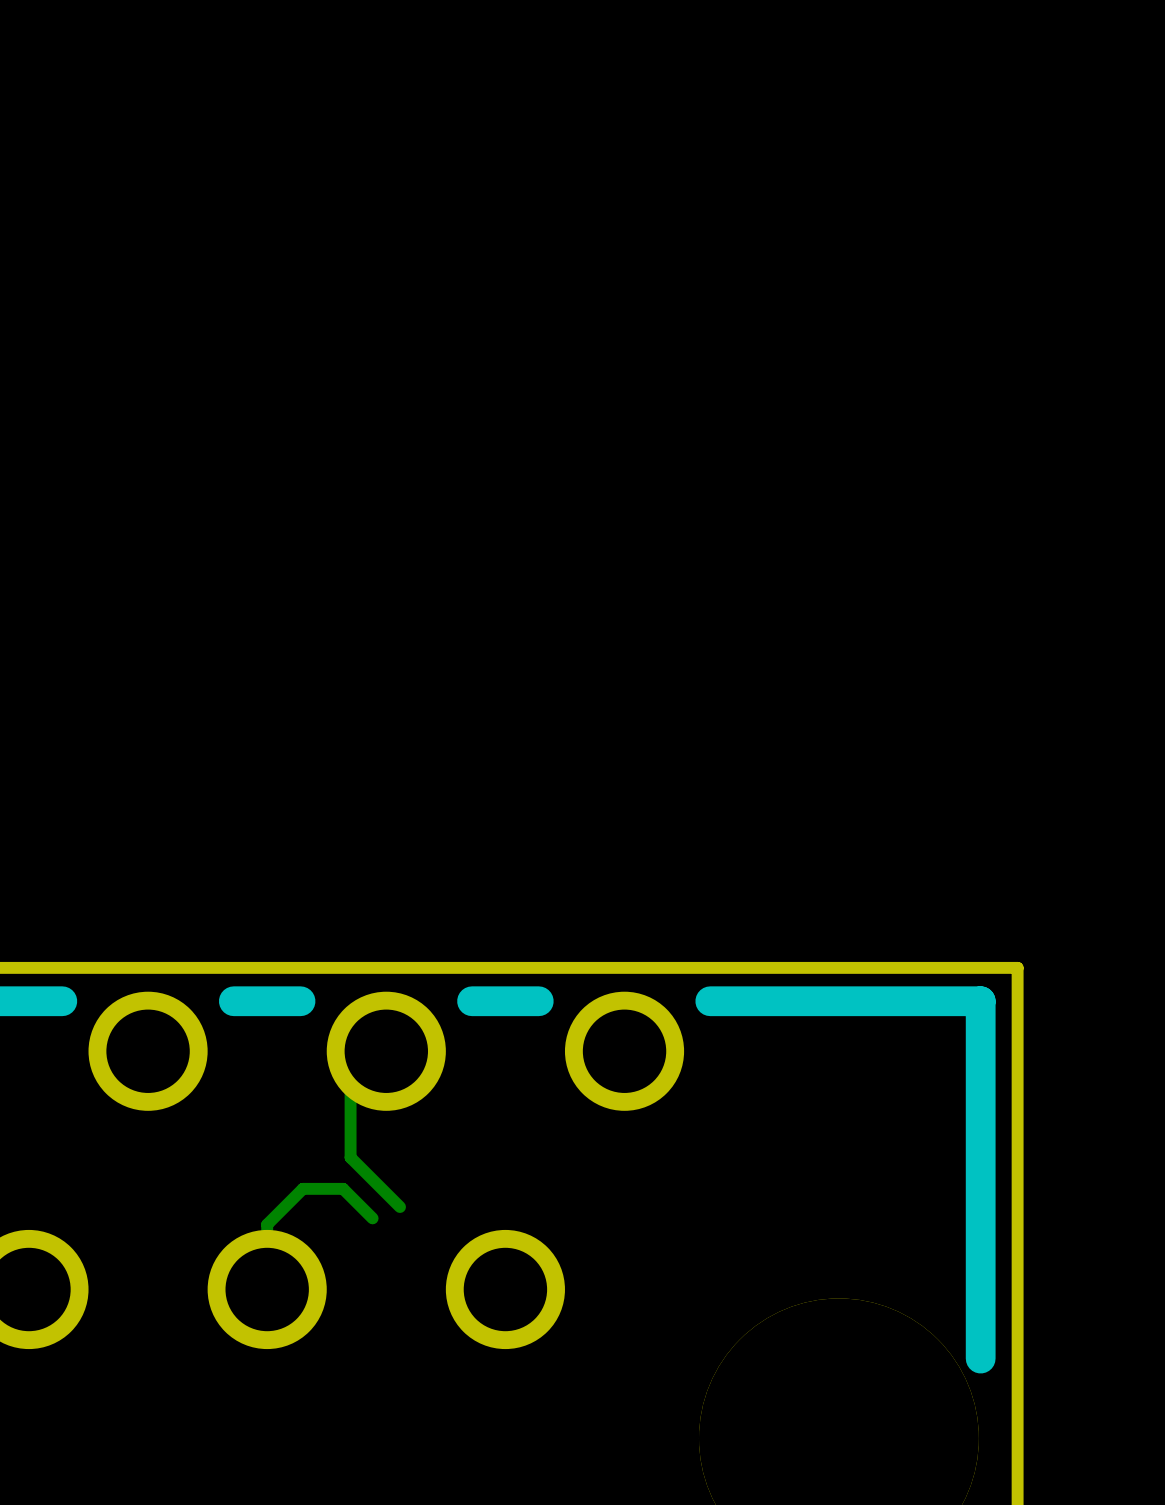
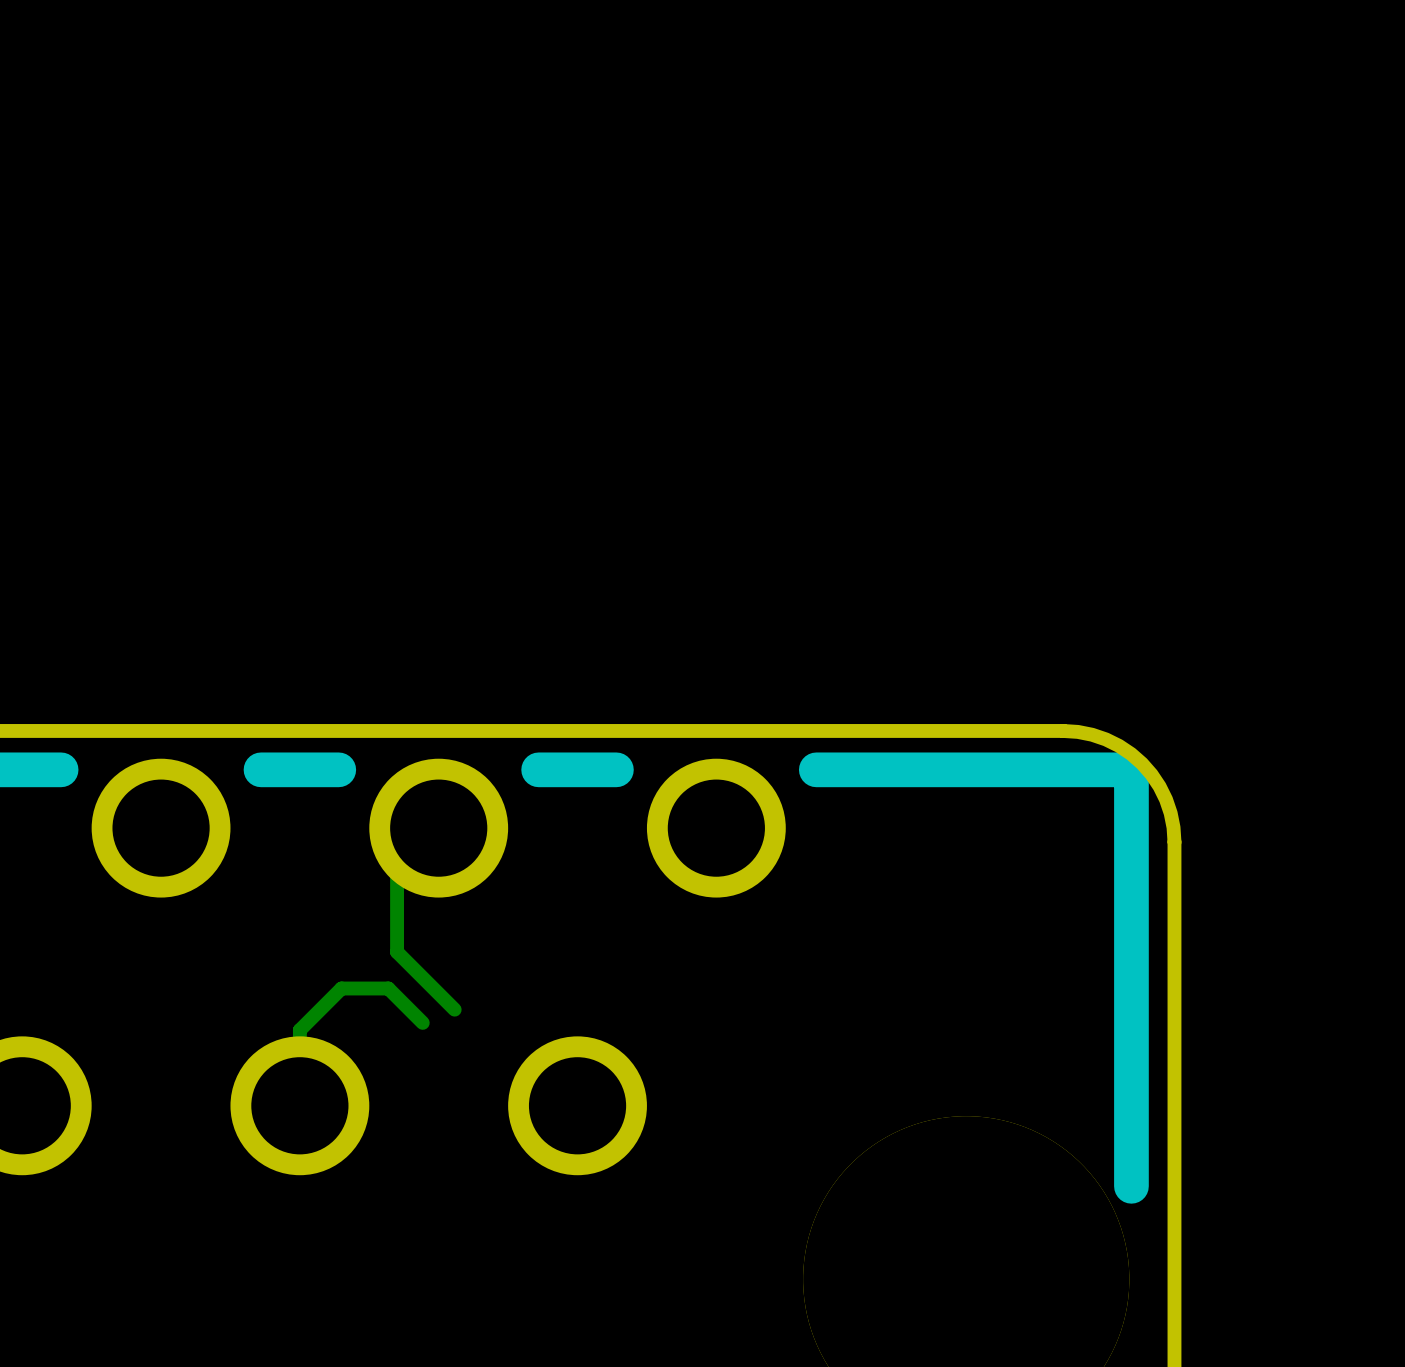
board edge: (922, 967) (1017, 967) (1017, 1063) -> (1063, 730) (1092, 734) (1105, 739) (1131, 753) (1141, 763) (1151, 774) (1166, 799) (1170, 813) (1174, 842)

